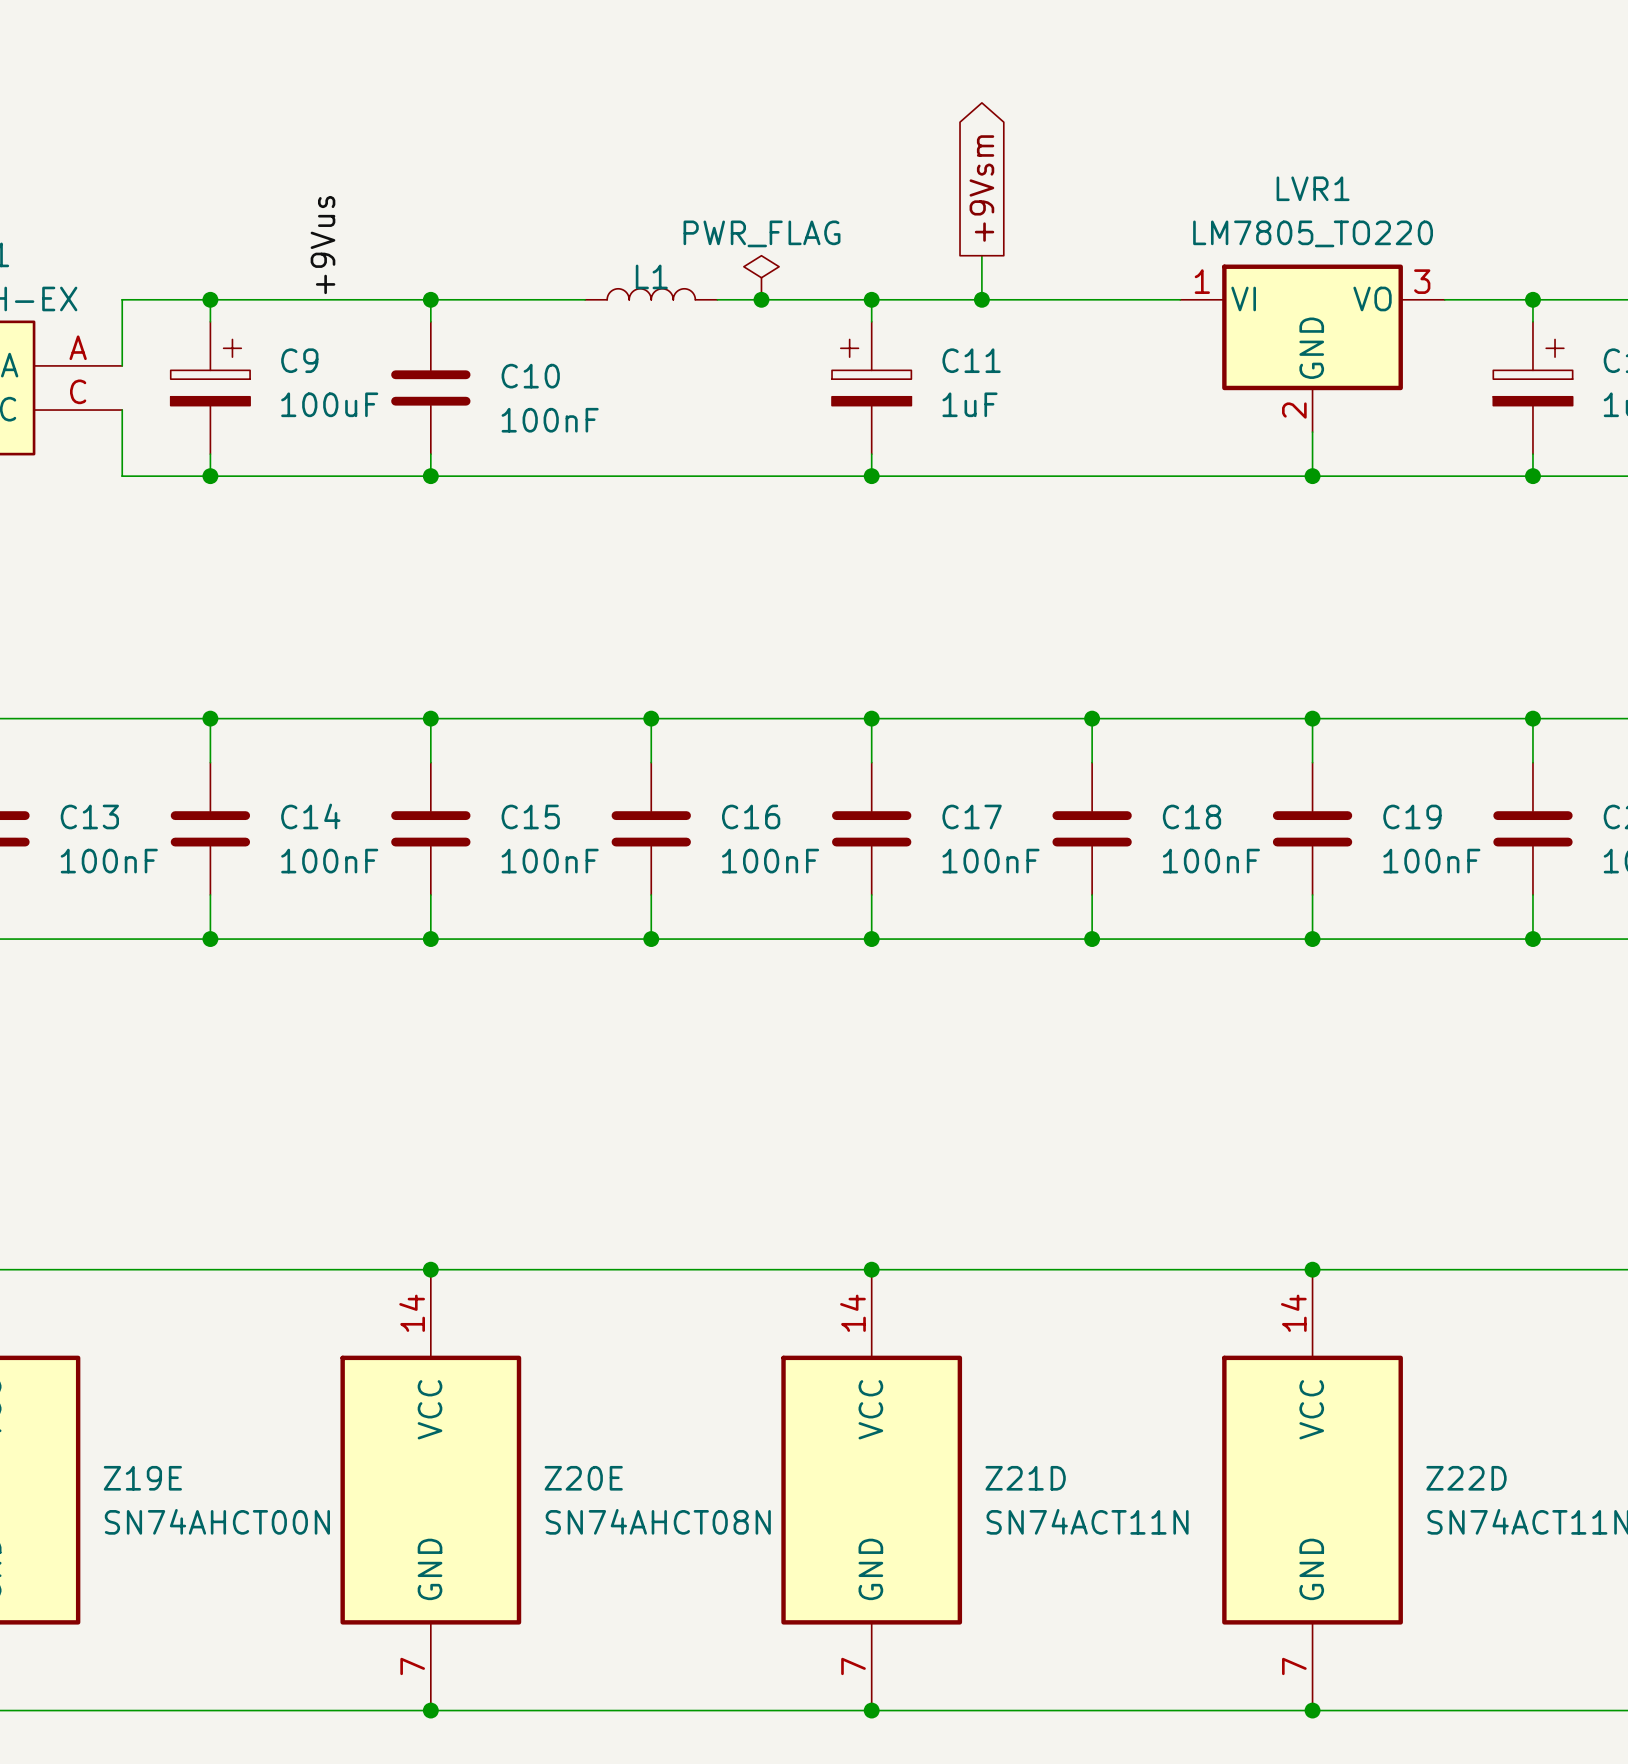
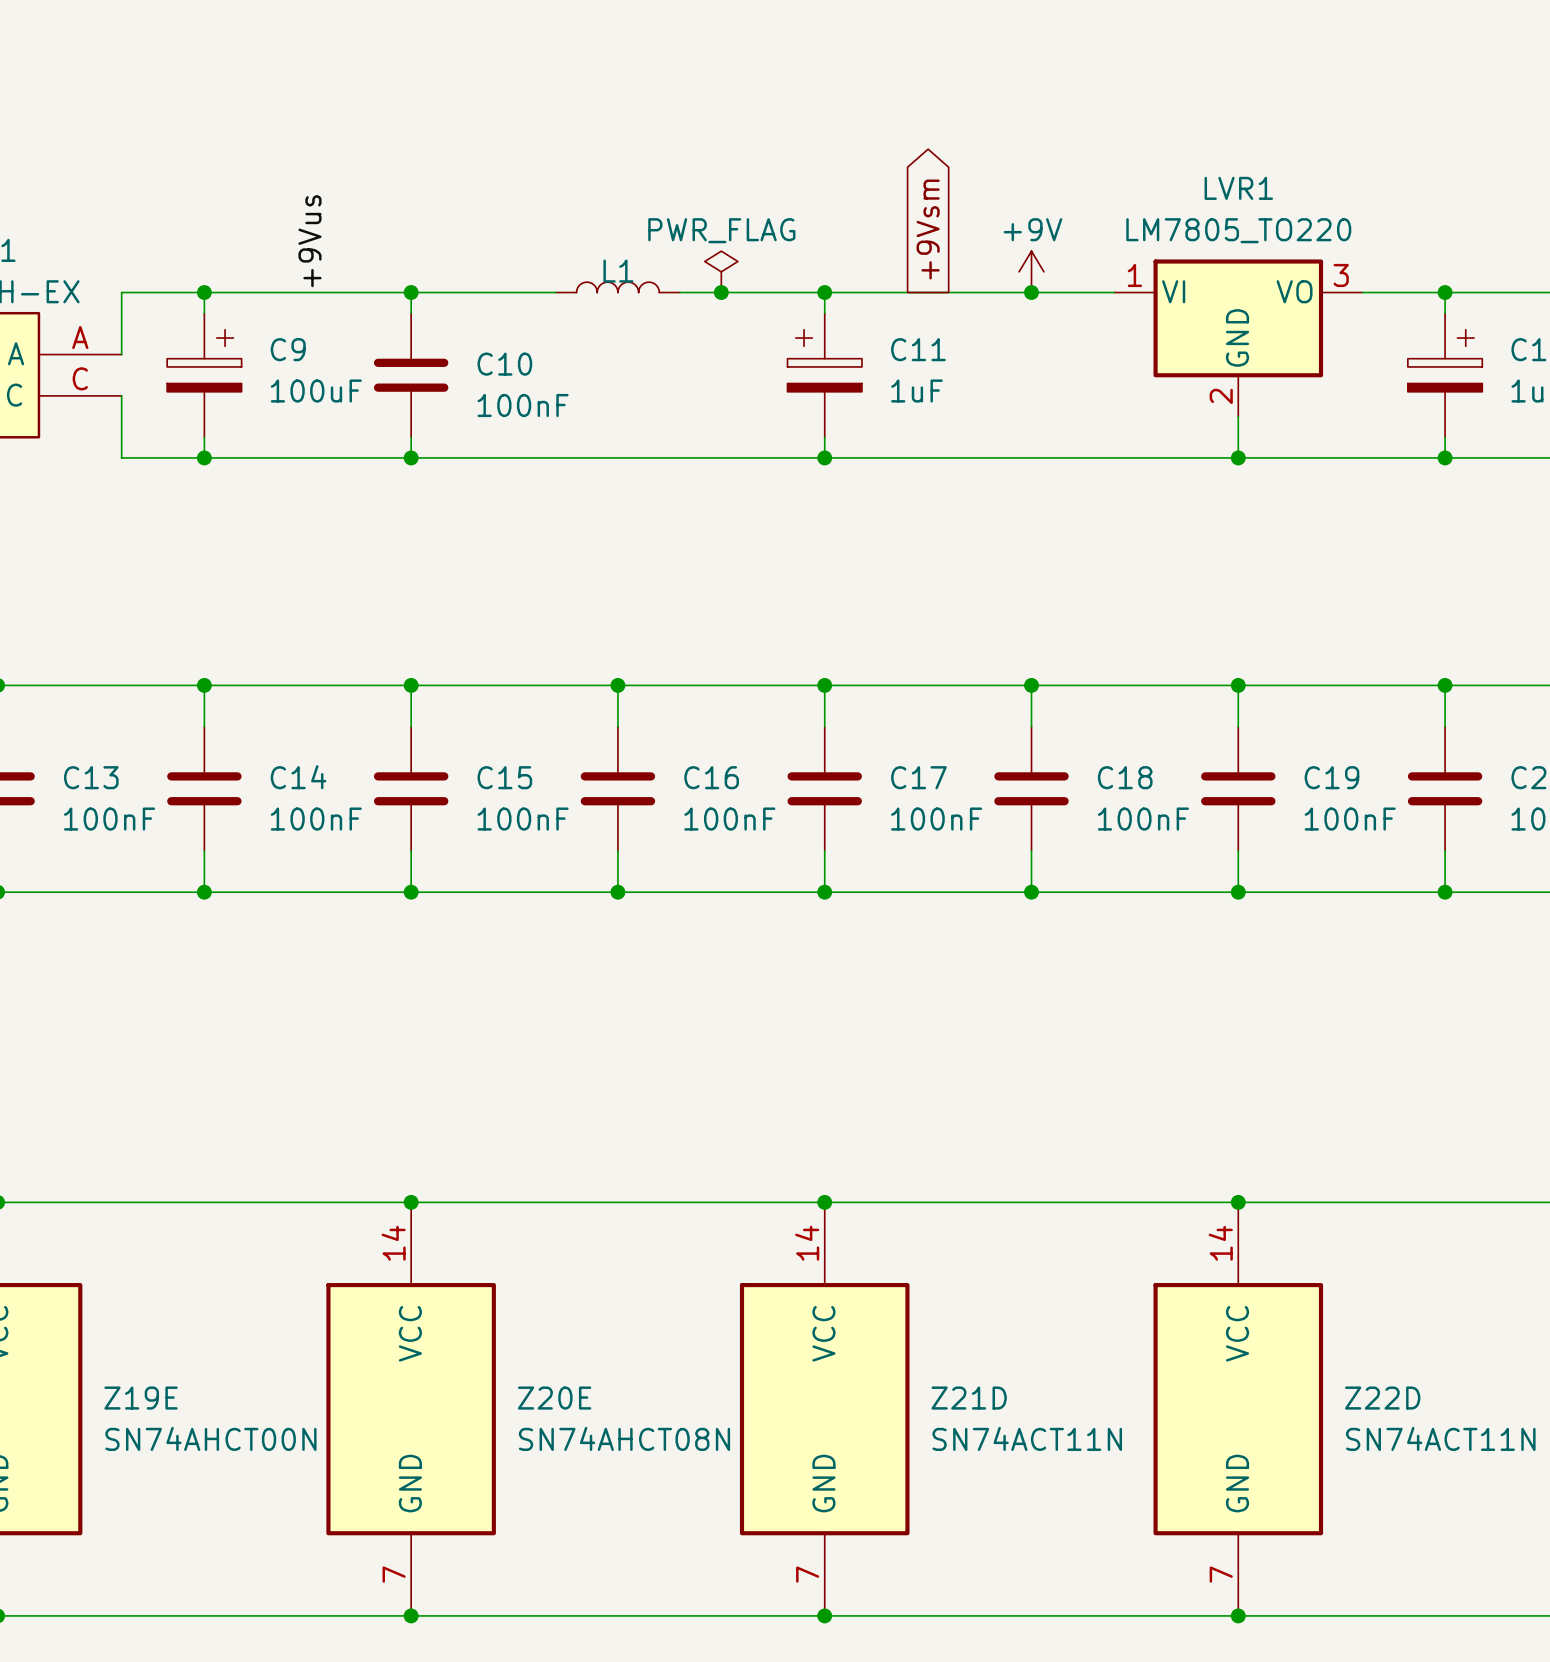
global label position: +9Vsm (981, 188) -> +9Vsm (928, 229)
wire: (981, 255) (981, 299) -> none
power symbol: none -> +9V (1031, 271)
junction: (981, 299) -> none
junction: none -> (1031, 292)

